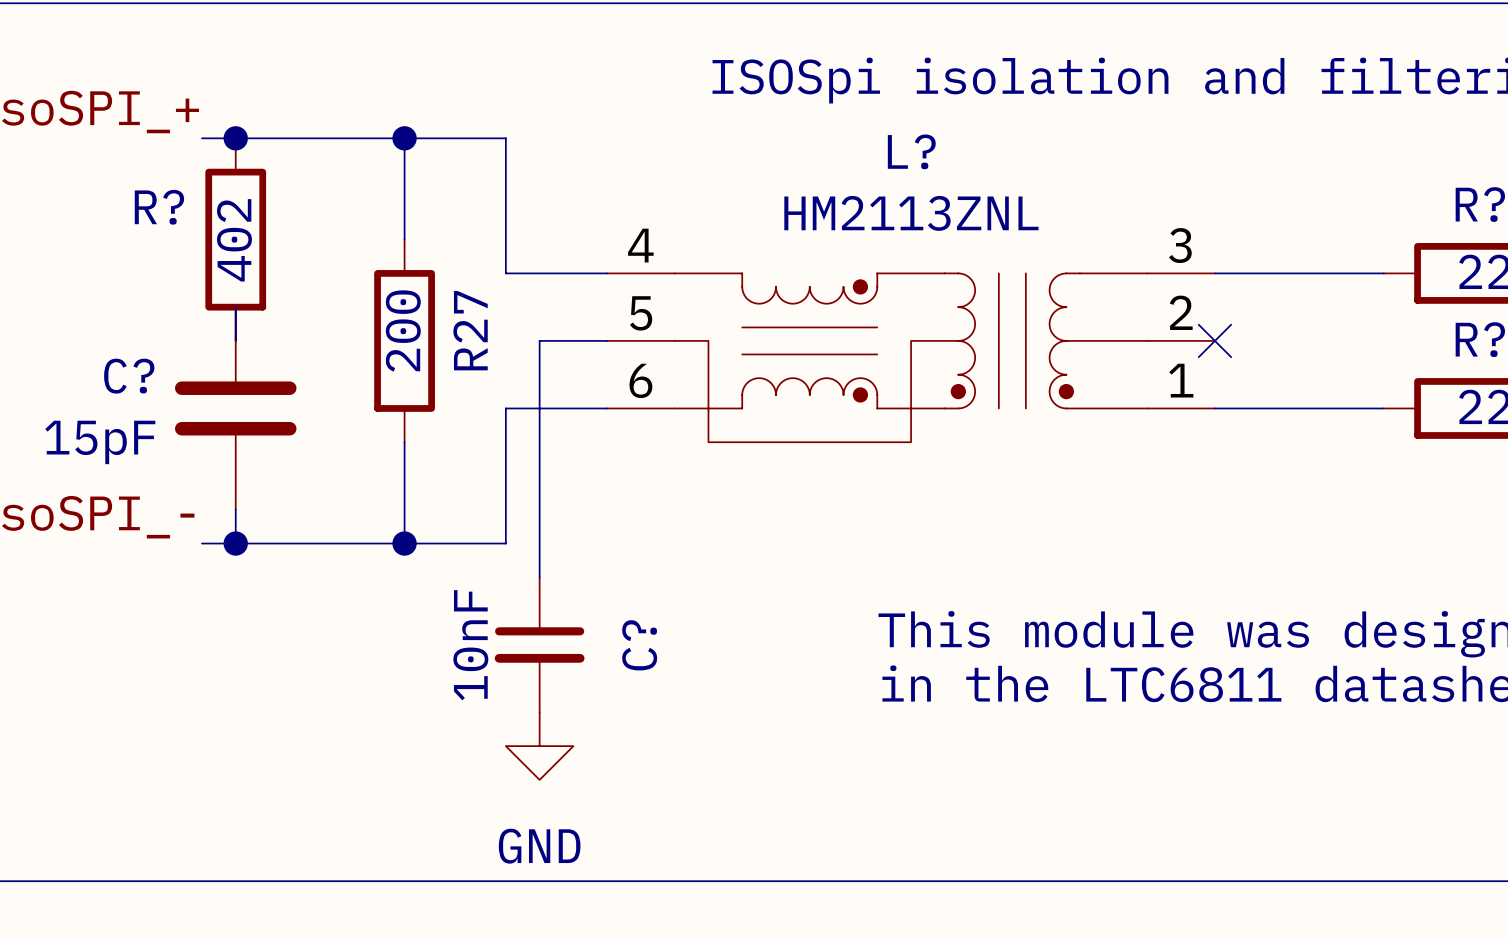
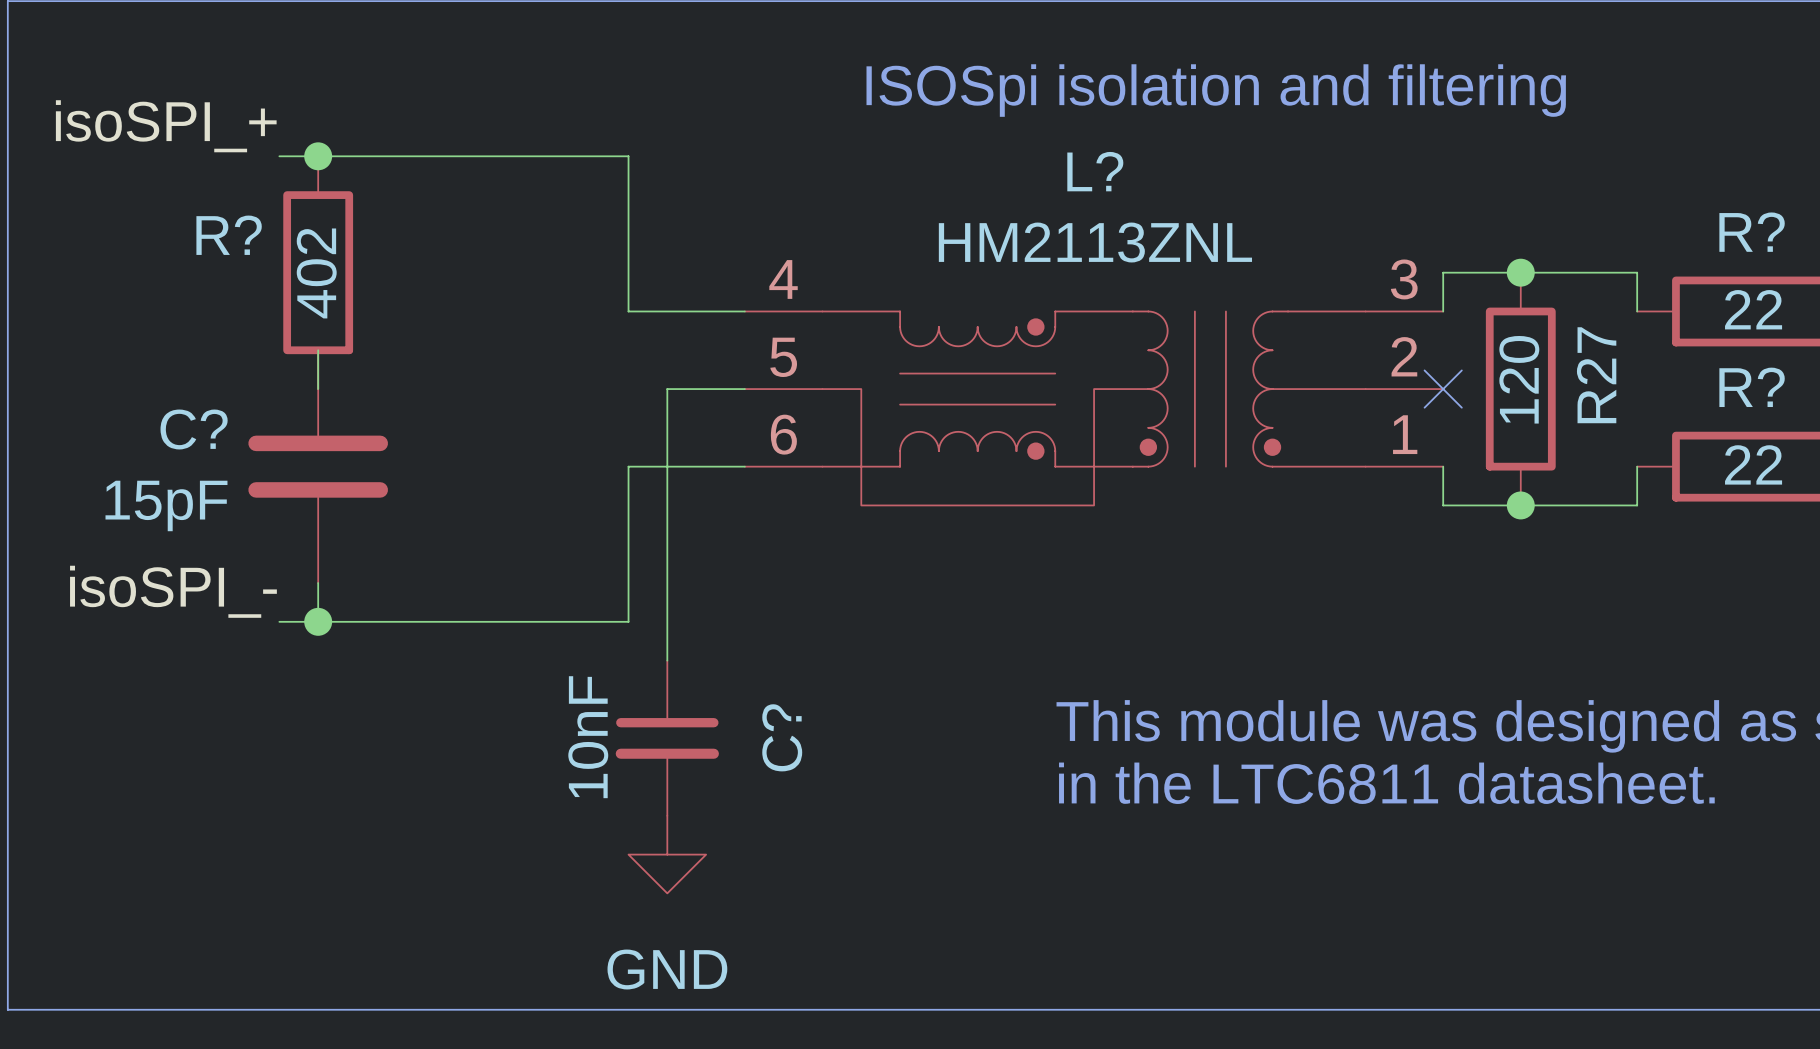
wire: (404, 138) (404, 239) -> none
junction: (404, 138) -> none
junction: none -> (1520, 272)
wire: (1214, 273) (1383, 273) -> (1443, 311) (1443, 272) (1637, 272) (1637, 311)
R27 value: 200 (403, 330) -> 120 (1519, 379)
R27 position: (404, 340) -> (1520, 389)
wire: (1214, 408) (1383, 408) -> (1443, 466) (1443, 505) (1637, 505) (1637, 466)
wire: (404, 442) (404, 543) -> none
junction: none -> (1520, 505)
junction: (404, 543) -> none

